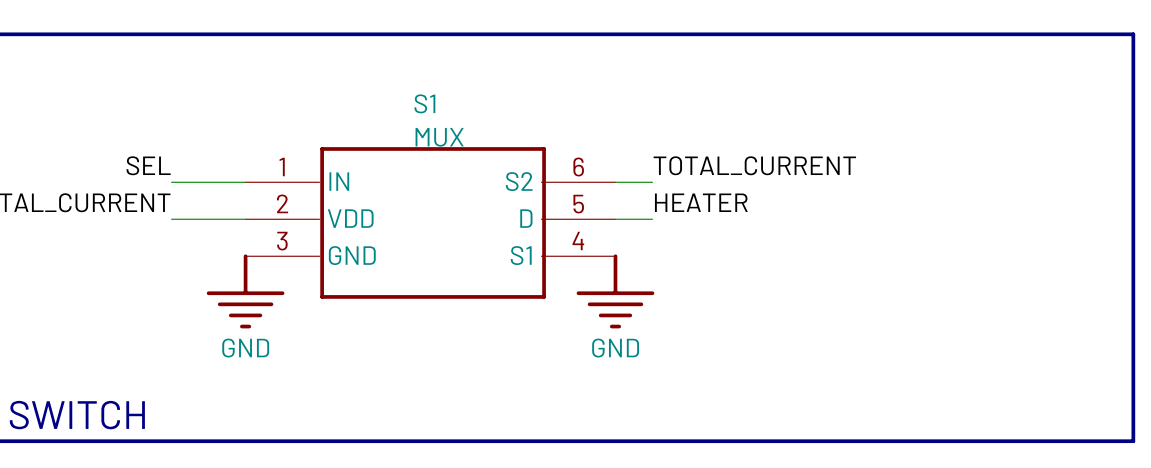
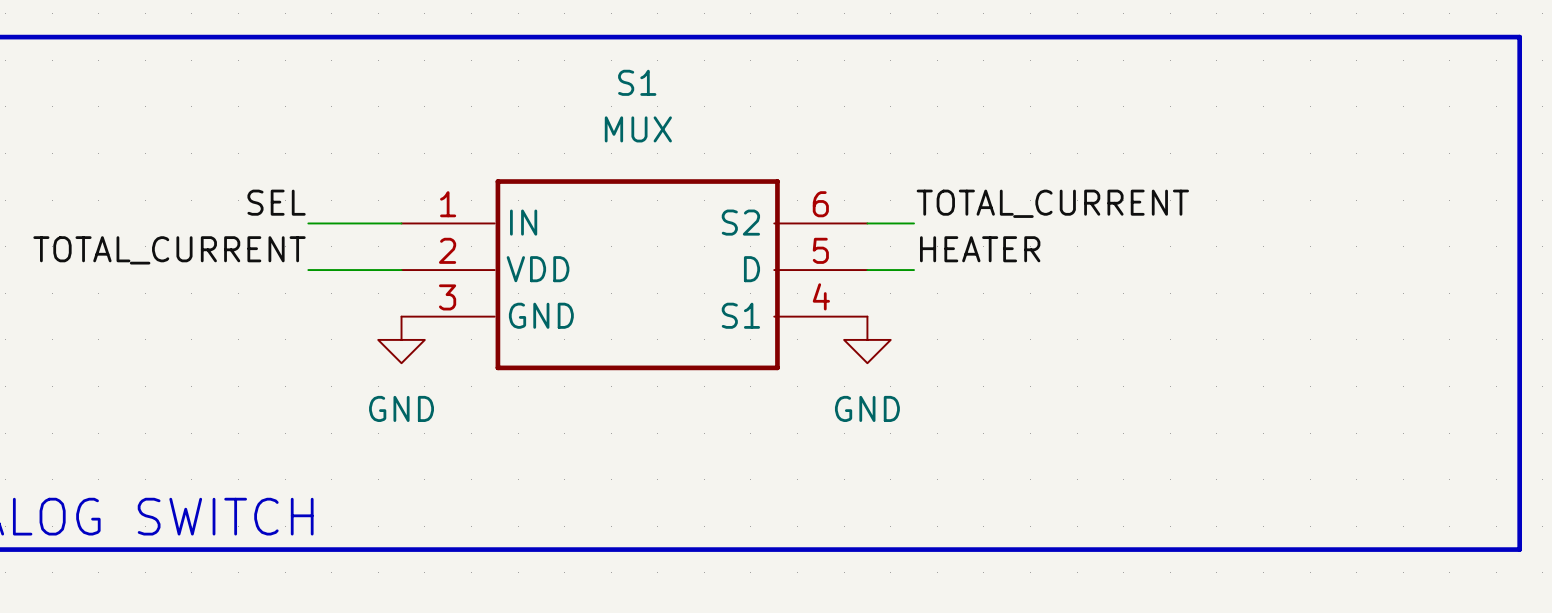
S1 name position: S1 (424, 103) -> S1 (637, 82)
S1 value position: MUX (439, 137) -> MUX (638, 129)
power symbol: none -> GND (401, 339)
power symbol: none -> GND (867, 339)
power symbol: GND (245, 291) -> none
power symbol: GND (615, 291) -> none

